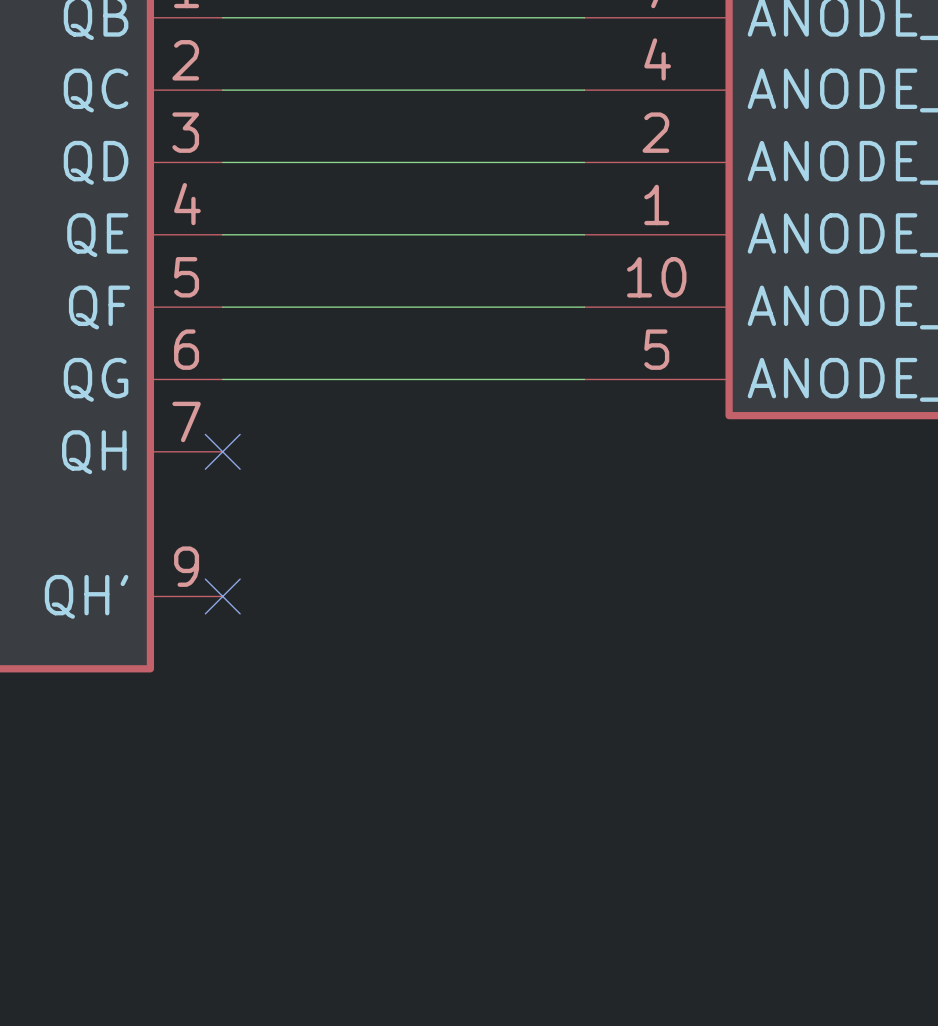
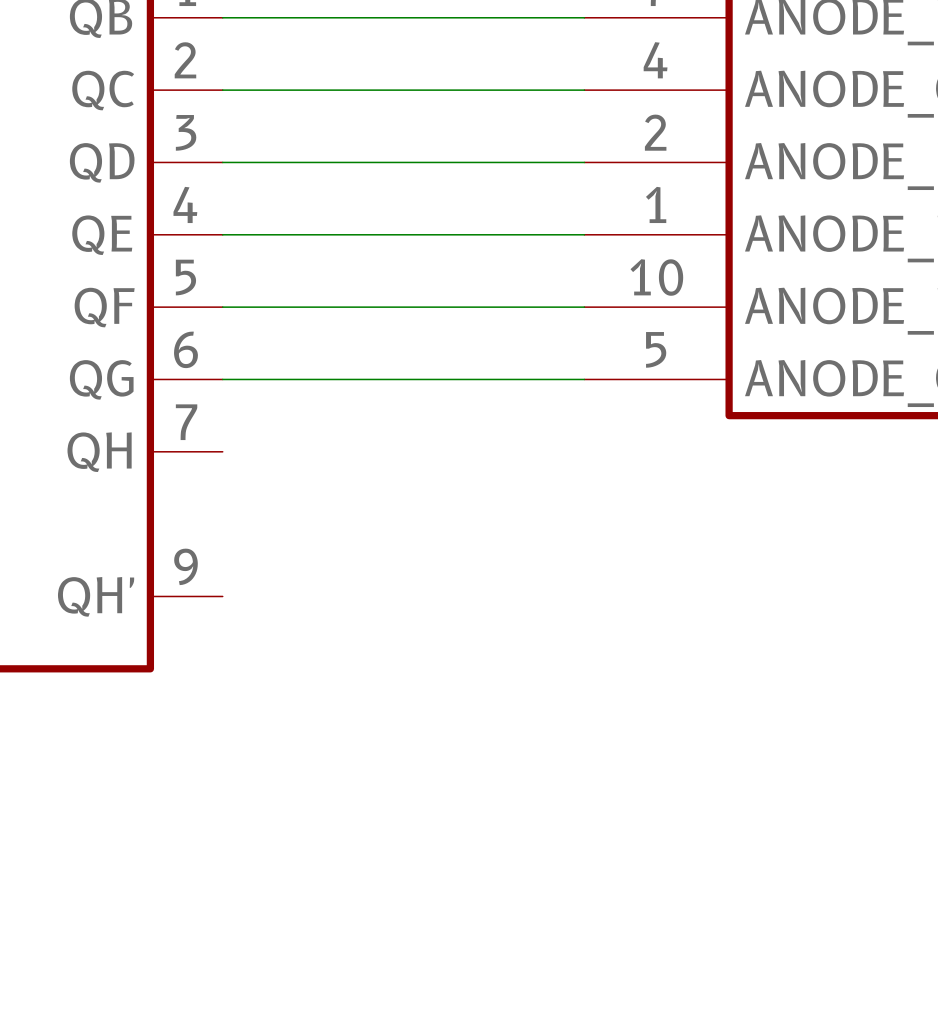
no-connect mark: (222, 451) -> none
no-connect mark: (222, 596) -> none

